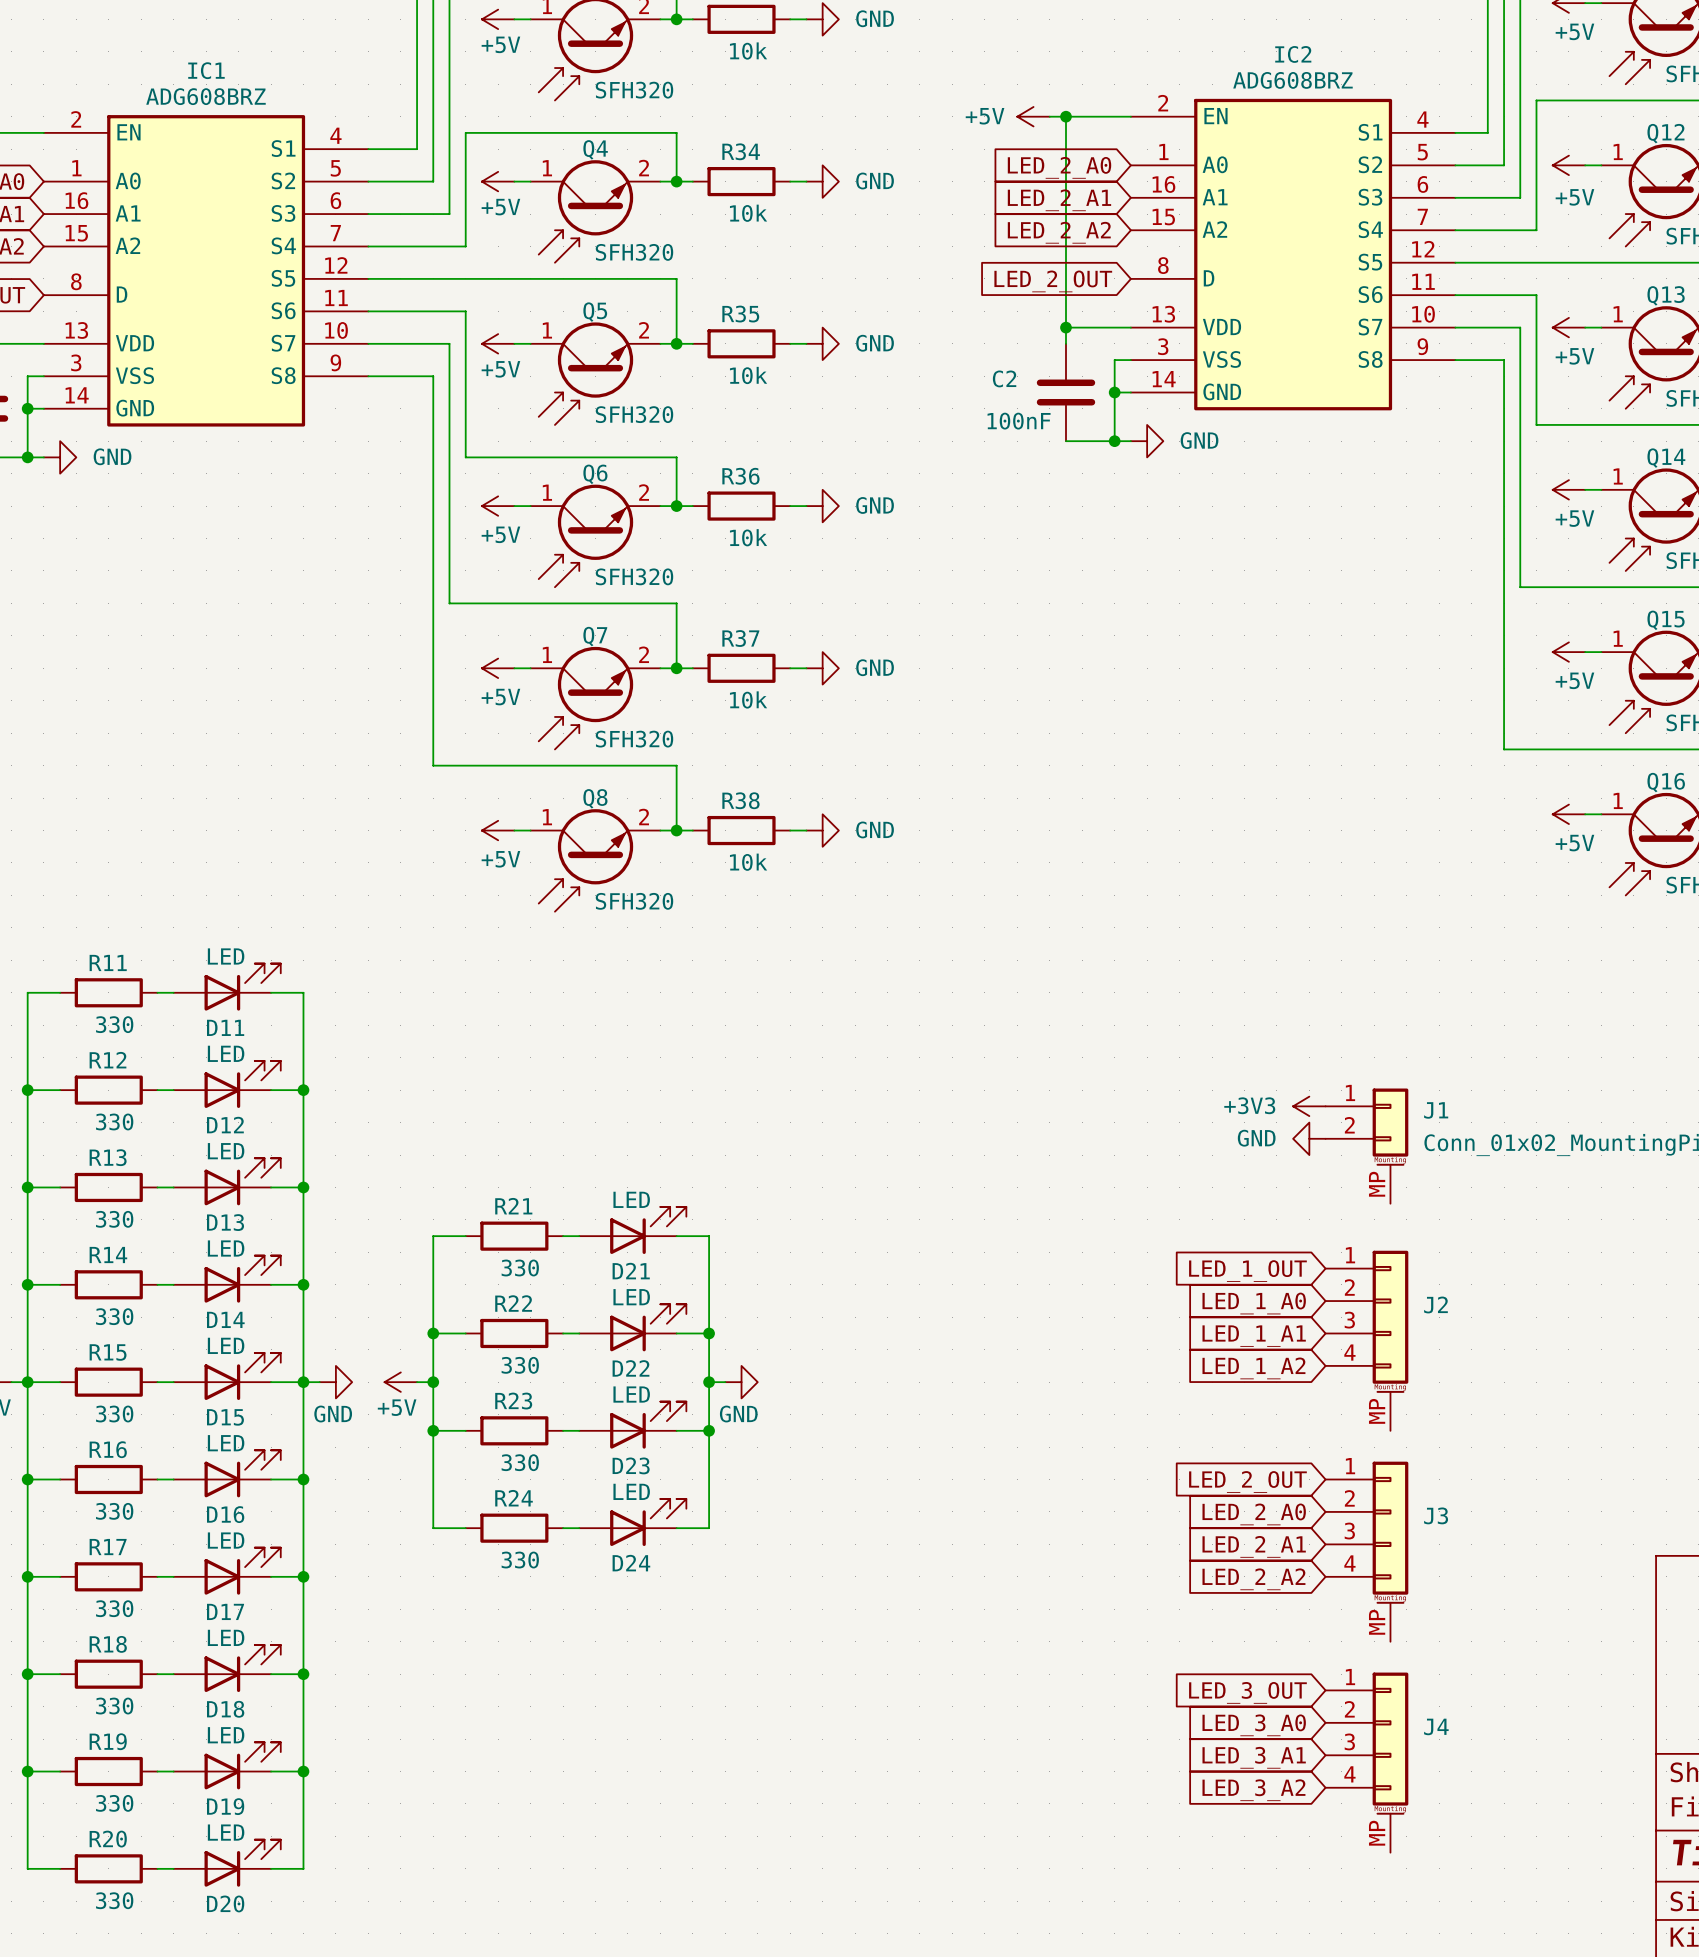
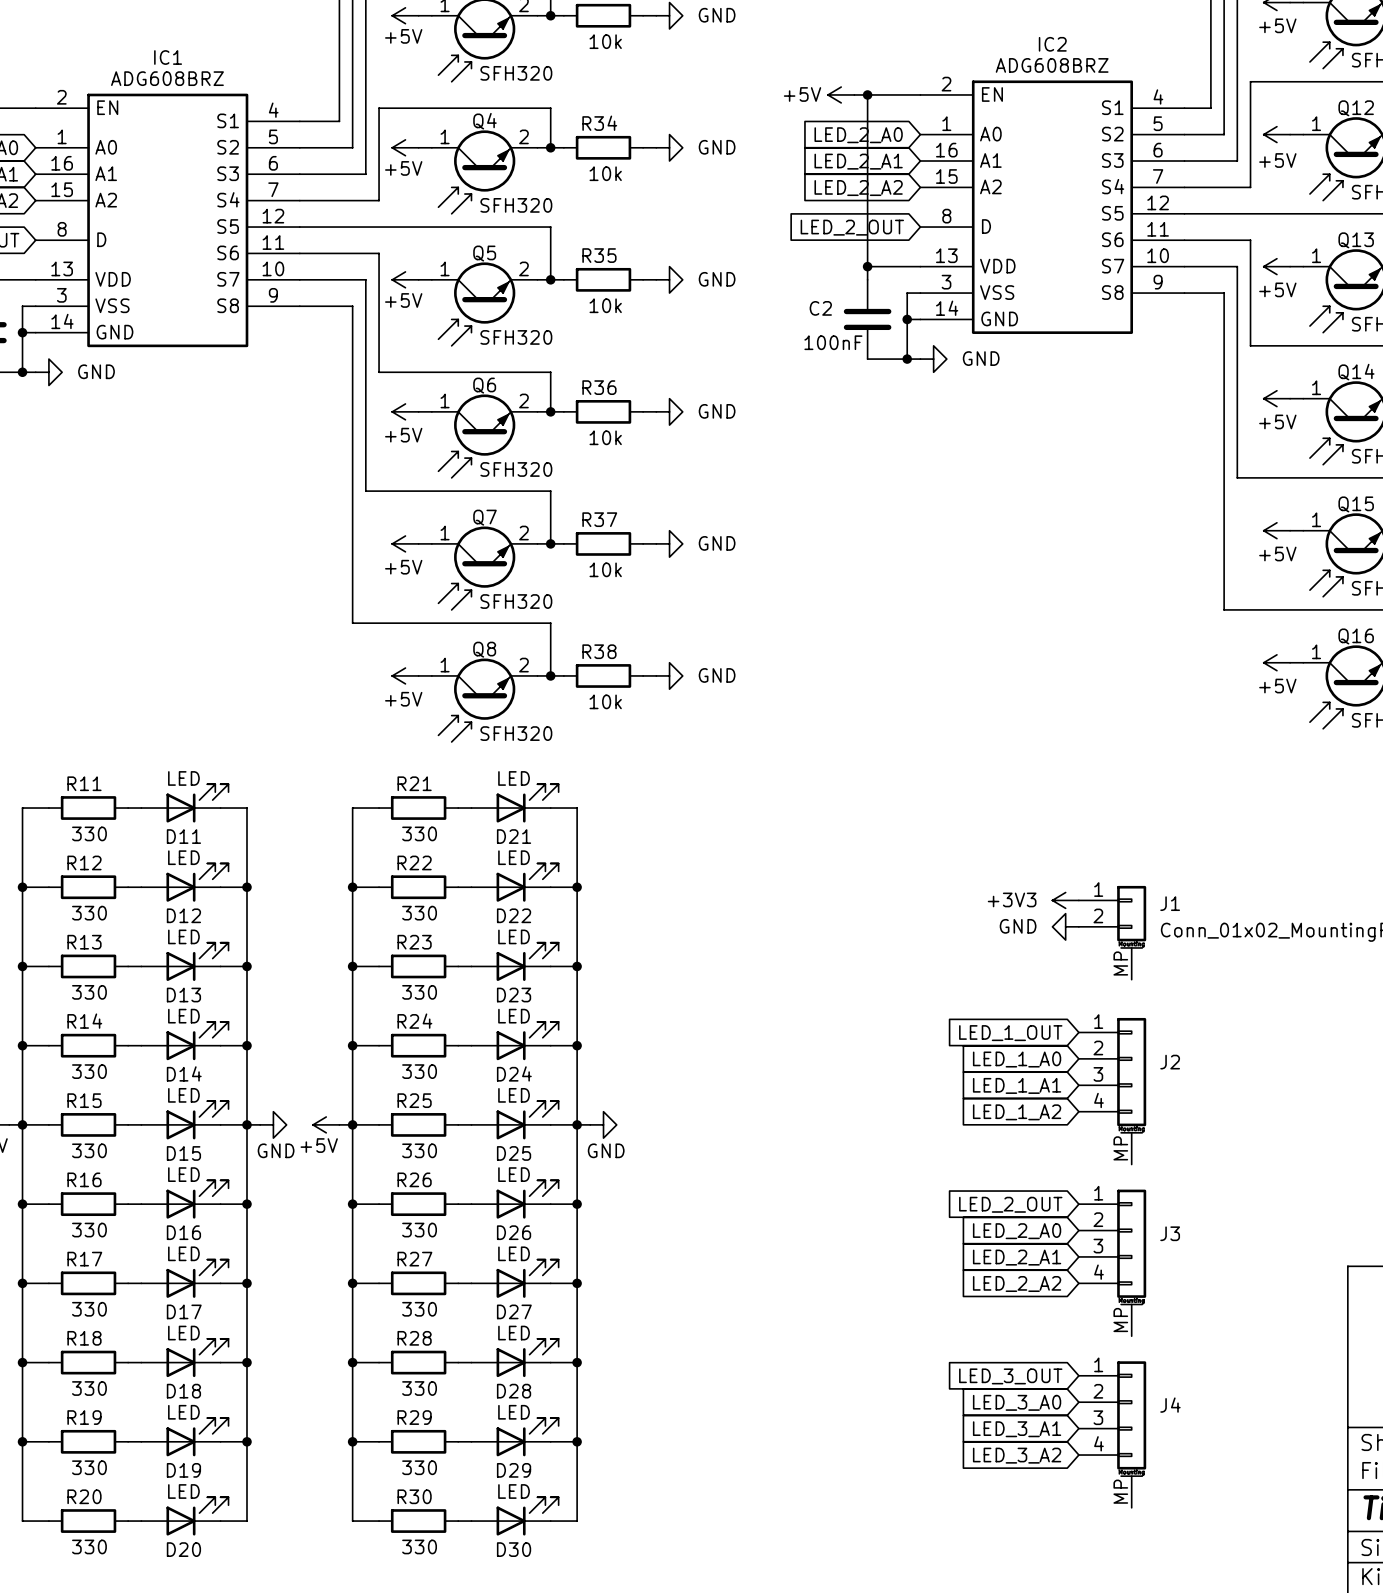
wire: none -> (458, 808) (471, 808)
wire: none -> (352, 887) (379, 887)
junction: none -> (352, 887)
wire: none -> (458, 887) (471, 887)
wire: none -> (550, 887) (577, 887)
junction: none -> (577, 887)
wire: none -> (352, 966) (379, 966)
junction: none -> (352, 966)
wire: none -> (550, 966) (577, 966)
junction: none -> (577, 966)
D21 position: (632, 1230) -> (515, 803)
wire: (433, 1236) (465, 1236) -> (352, 1006) (352, 808) (379, 808)
R21 position: (514, 1236) -> (418, 808)
wire: (563, 1236) (579, 1236) -> (458, 966) (471, 966)
wire: (676, 1236) (709, 1236) -> (550, 808) (577, 808) (577, 1006)
D22 position: (632, 1327) -> (515, 882)
wire: (433, 1333) (465, 1333) -> (352, 1045) (379, 1045)
junction position: (433, 1333) -> (352, 1045)
R22 position: (514, 1333) -> (418, 887)
wire: (563, 1333) (579, 1333) -> (458, 1045) (471, 1045)
wire: (676, 1333) (709, 1333) -> (550, 1045) (577, 1045)
junction position: (709, 1333) -> (577, 1045)
D25: none -> LED (515, 1120)
R25: none -> 330 (418, 1124)
D23 position: (632, 1425) -> (515, 961)
wire: (433, 1430) (465, 1430) -> (352, 1124) (379, 1124)
junction position: (433, 1430) -> (352, 1204)
R23 position: (514, 1430) -> (418, 966)
wire: (563, 1430) (579, 1430) -> (458, 1124) (471, 1124)
wire: (676, 1430) (709, 1430) -> (550, 1124) (577, 1124)
junction position: (709, 1430) -> (577, 1204)
D26: none -> LED (515, 1199)
wire: none -> (352, 1204) (379, 1204)
R26: none -> 330 (418, 1204)
wire: none -> (458, 1204) (471, 1204)
wire: none -> (550, 1204) (577, 1204)
D24 position: (632, 1522) -> (515, 1041)
wire: (433, 1528) (465, 1528) -> (352, 1243) (352, 1521) (379, 1521)
R24 position: (514, 1528) -> (418, 1045)
wire: (563, 1528) (579, 1528) -> (458, 1283) (471, 1283)
wire: (676, 1528) (709, 1528) -> (550, 1521) (577, 1521) (577, 1243)
D27: none -> LED (515, 1278)
wire: none -> (352, 1283) (379, 1283)
junction: none -> (352, 1283)
R27: none -> 330 (418, 1283)
wire: none -> (550, 1283) (577, 1283)
junction: none -> (577, 1283)
D28: none -> LED (515, 1357)
wire: none -> (352, 1362) (379, 1362)
junction: none -> (352, 1362)
R28: none -> 330 (418, 1362)
wire: none -> (458, 1362) (471, 1362)
wire: none -> (550, 1362) (577, 1362)
junction: none -> (577, 1362)
D29: none -> LED (515, 1437)
wire: none -> (352, 1441) (379, 1441)
junction: none -> (352, 1441)
R29: none -> 330 (418, 1441)
wire: none -> (458, 1441) (471, 1441)
wire: none -> (550, 1441) (577, 1441)
junction: none -> (577, 1441)
D30: none -> LED (515, 1516)
R30: none -> 330 (418, 1521)
wire: none -> (458, 1521) (471, 1521)

